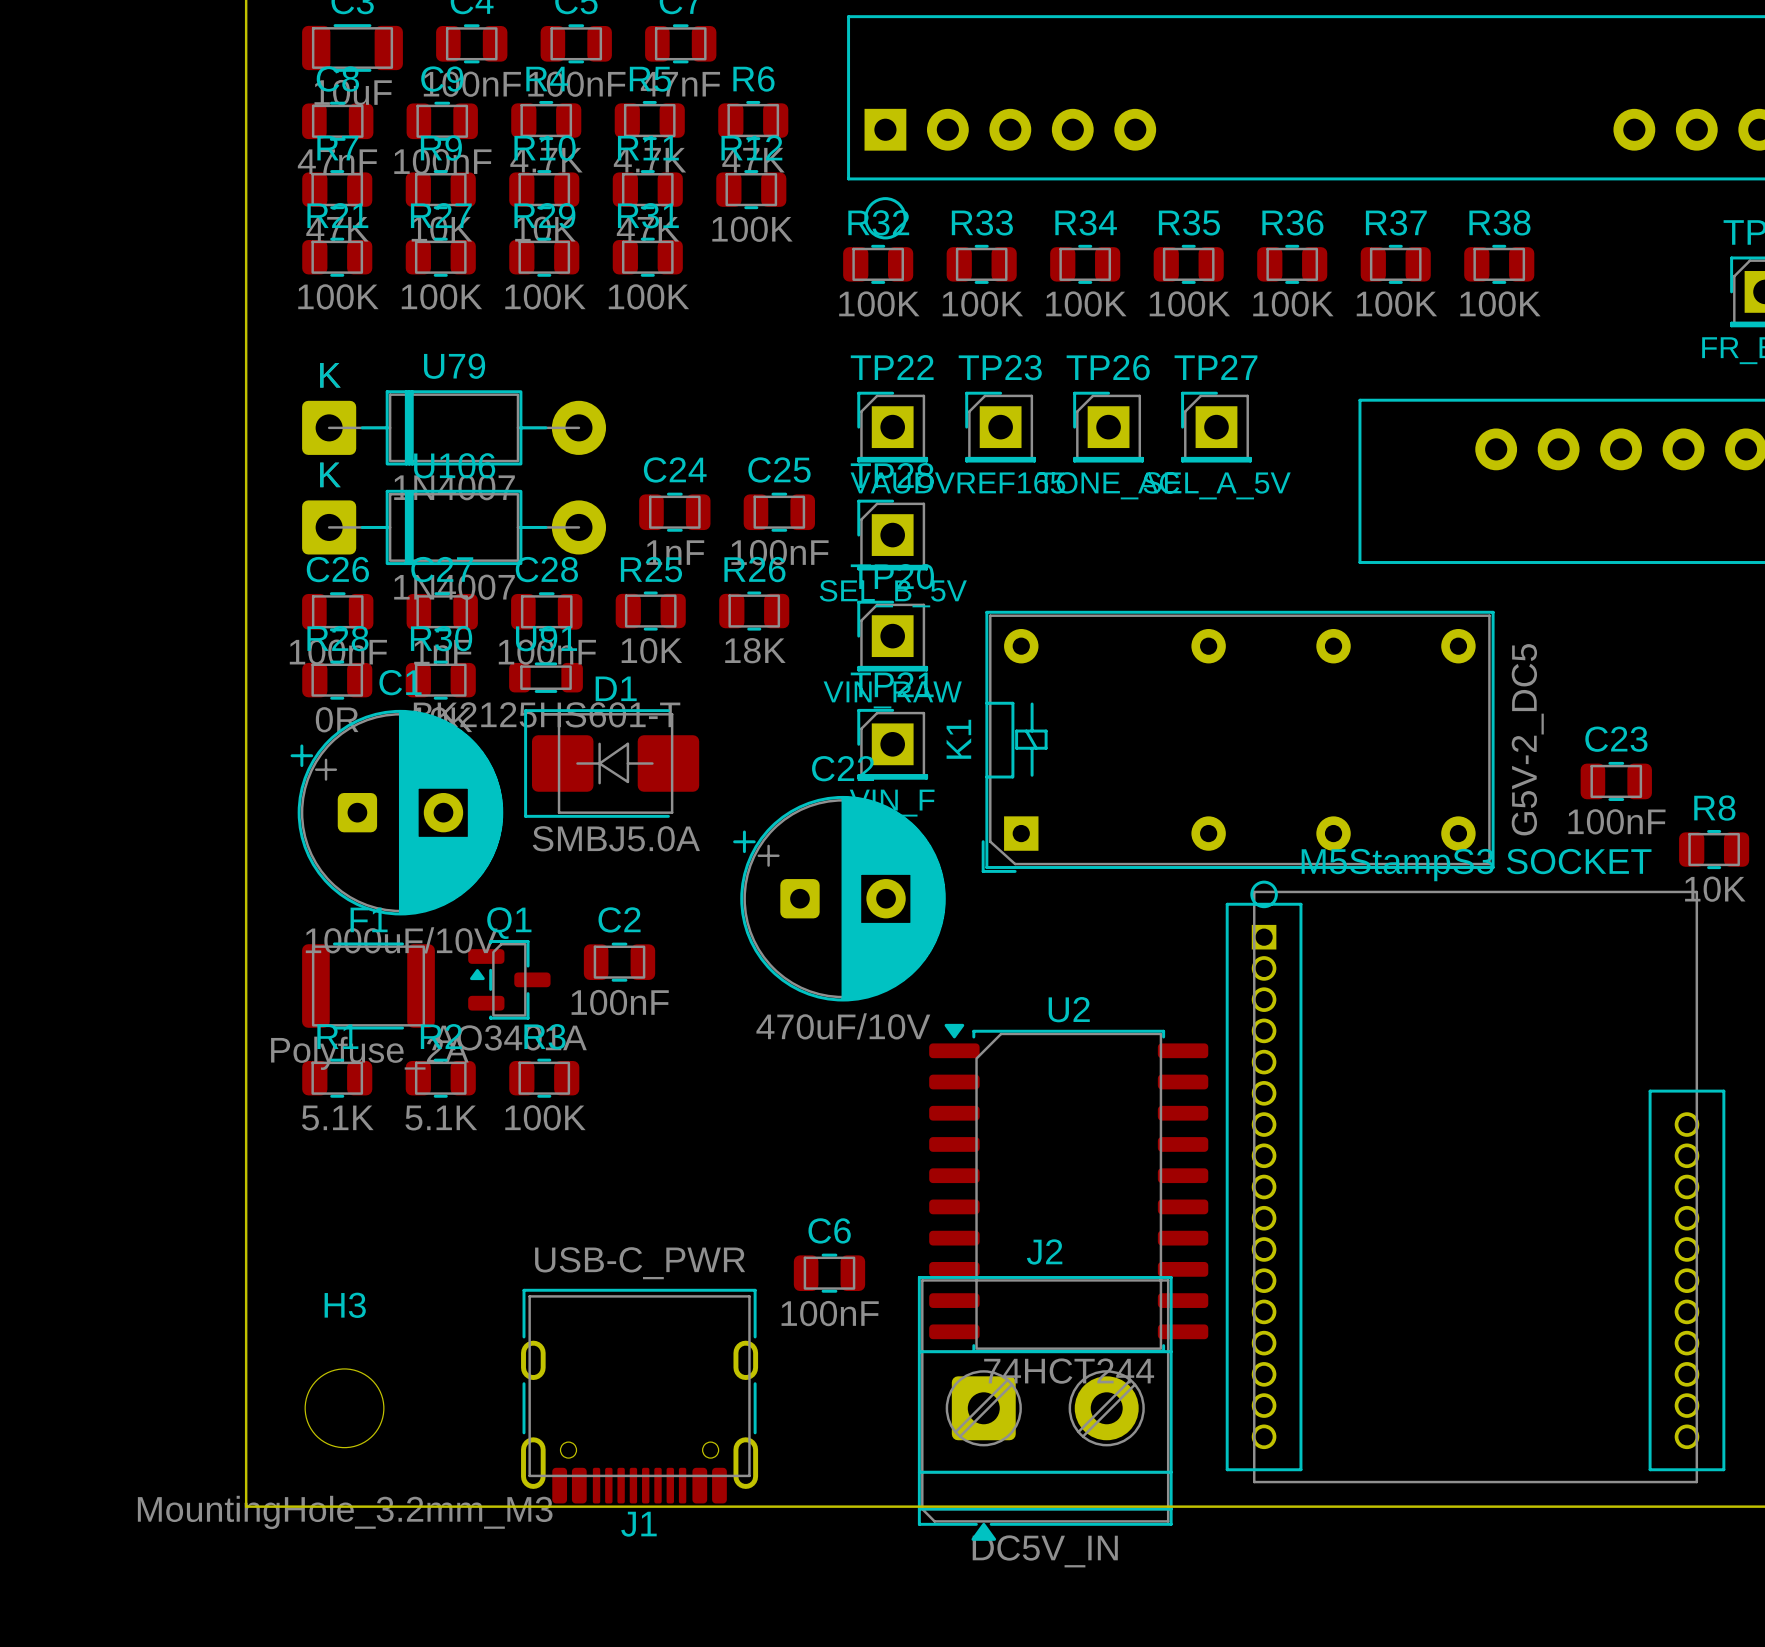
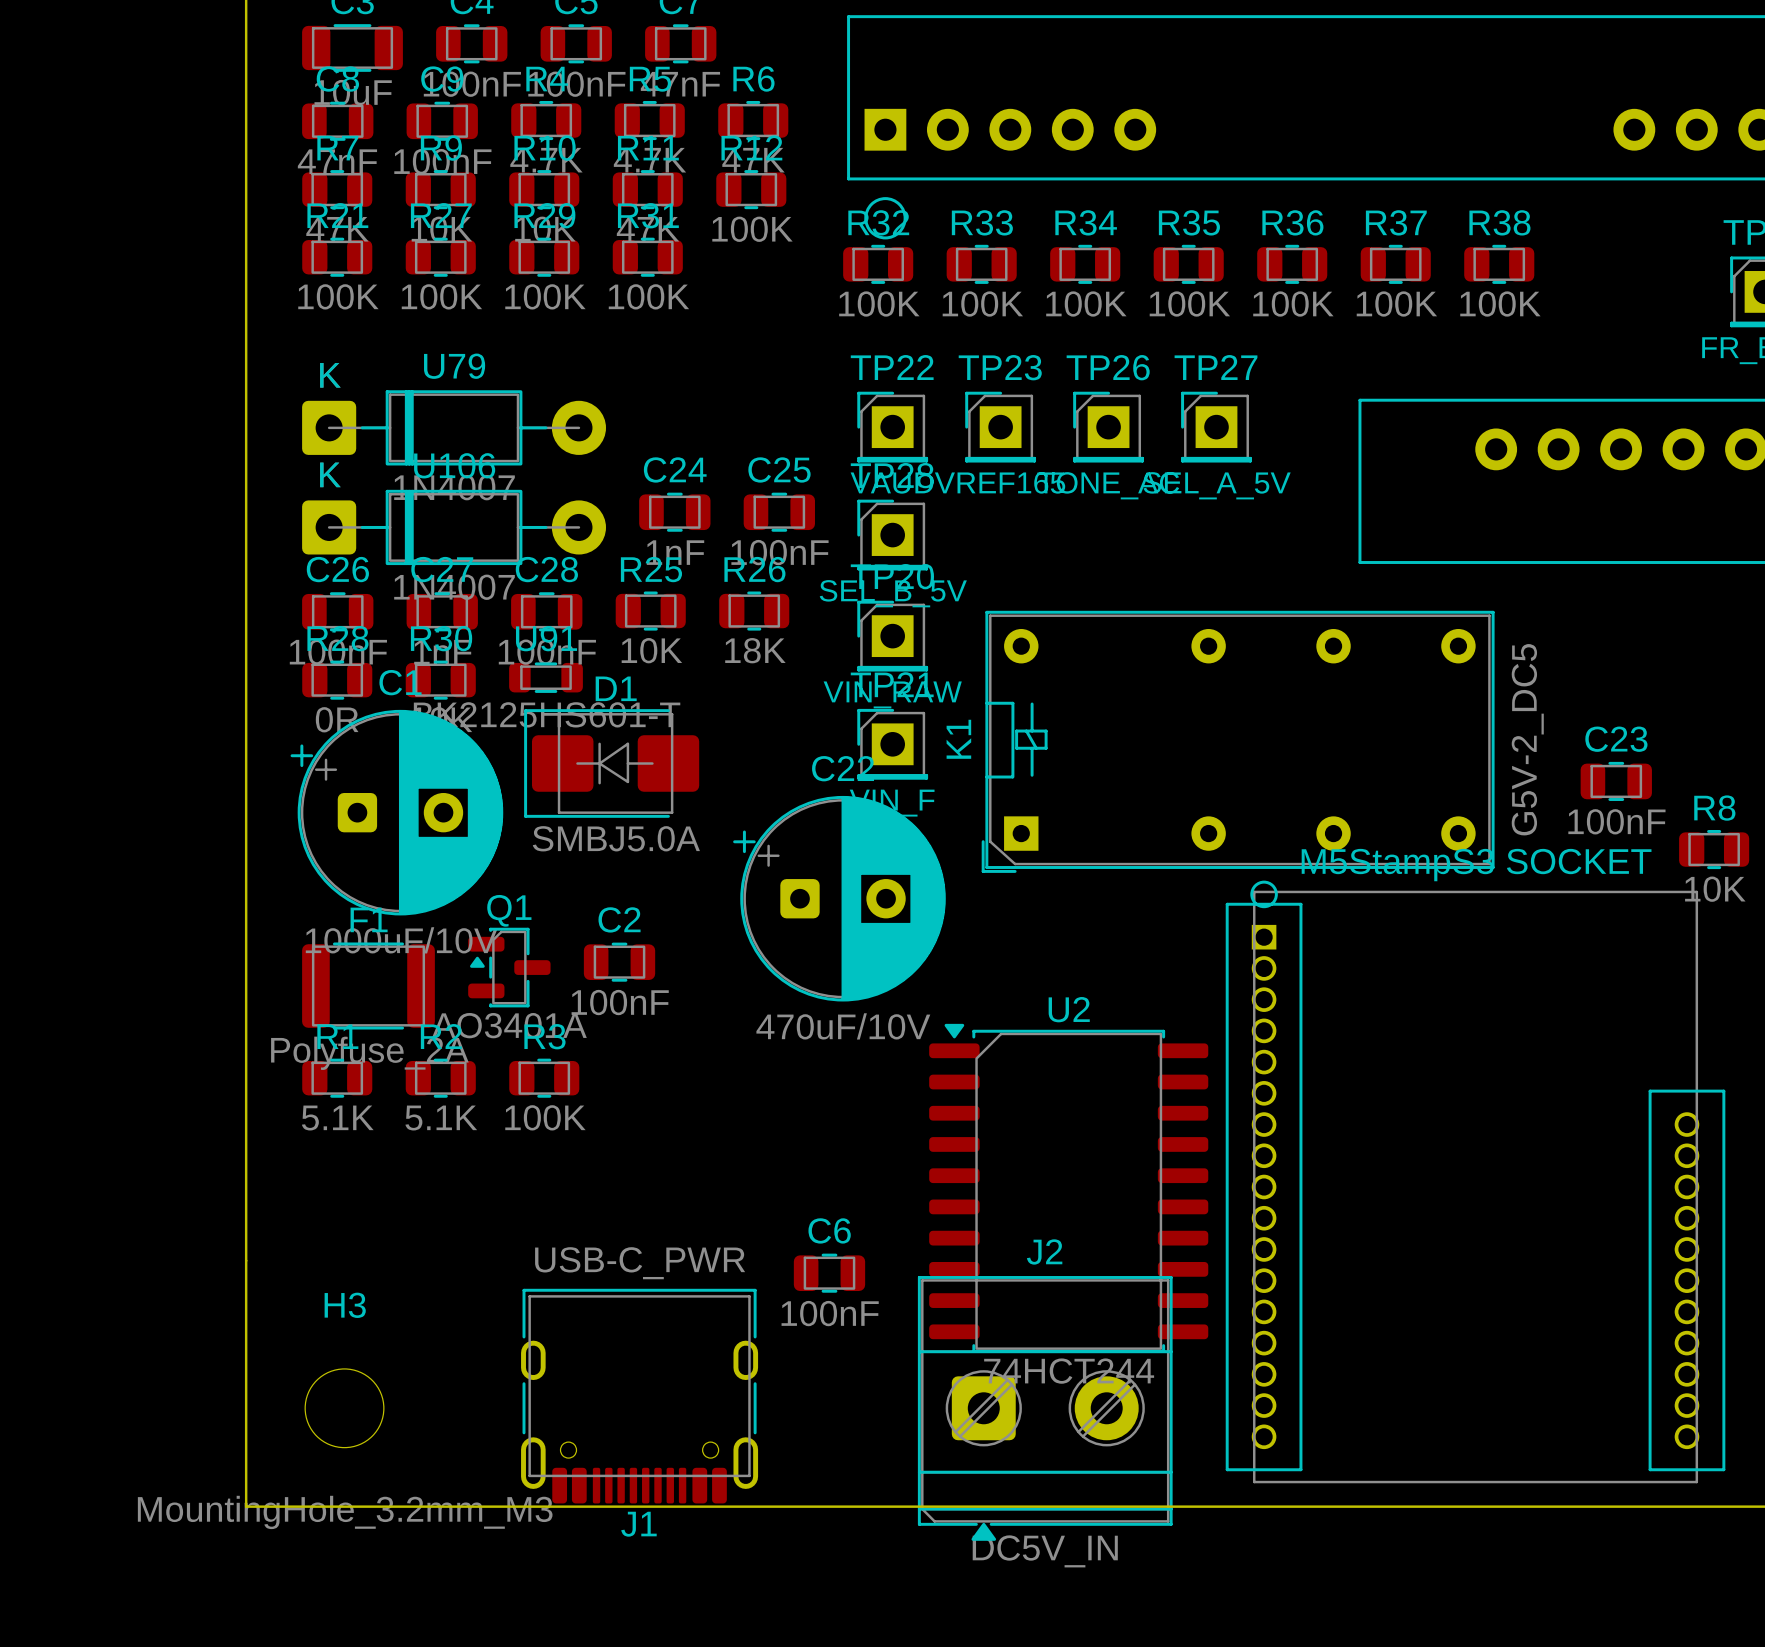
Q1 position: (509, 979) -> (509, 967)

